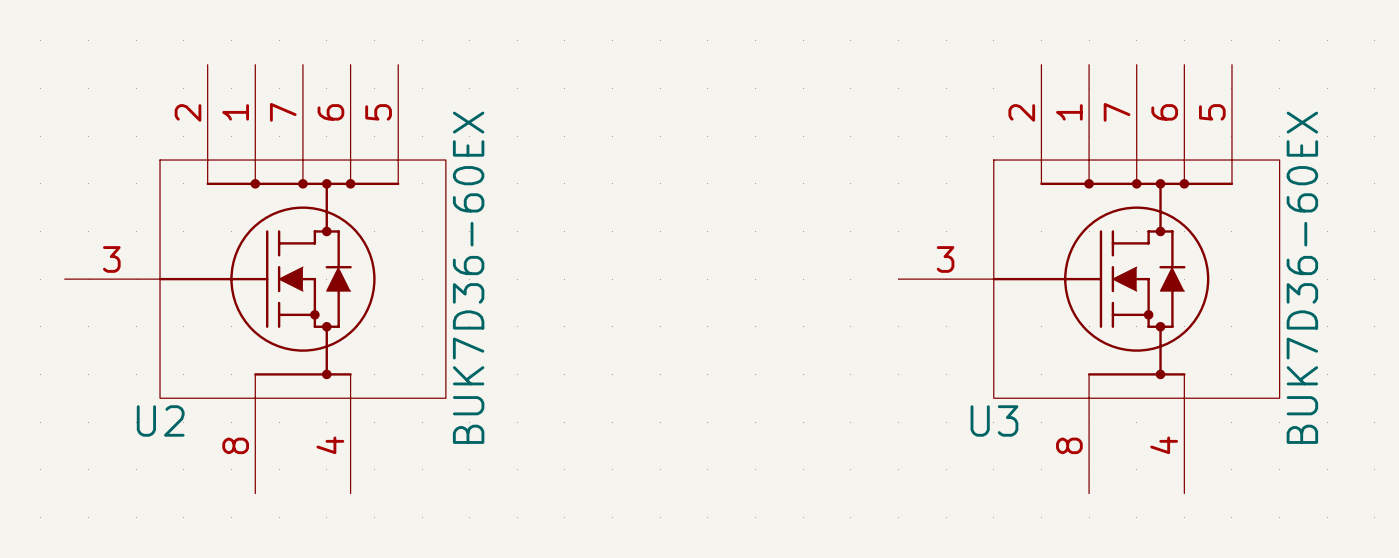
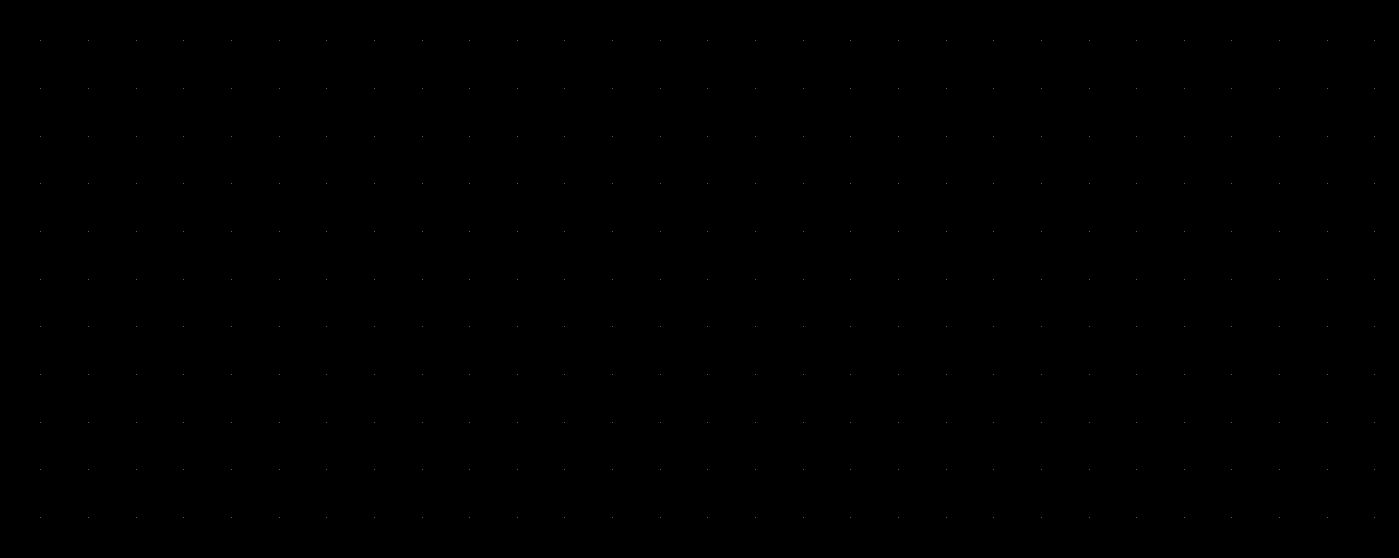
U2: BUK7D36-60EX (255, 279) -> none
U3: BUK7D36-60EX (1089, 279) -> none

